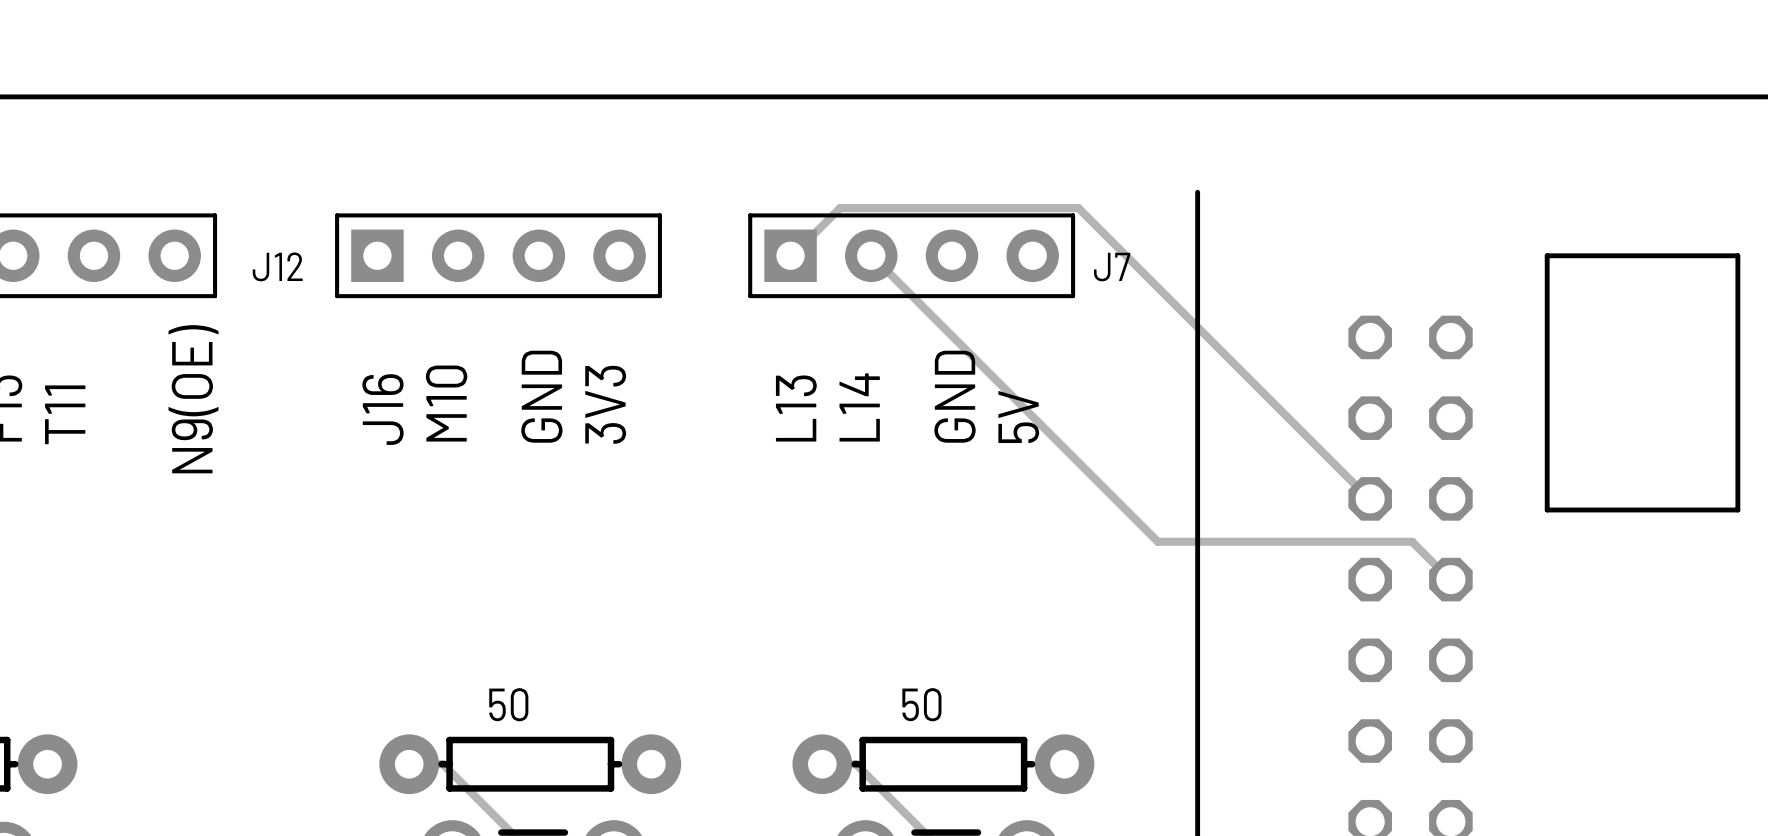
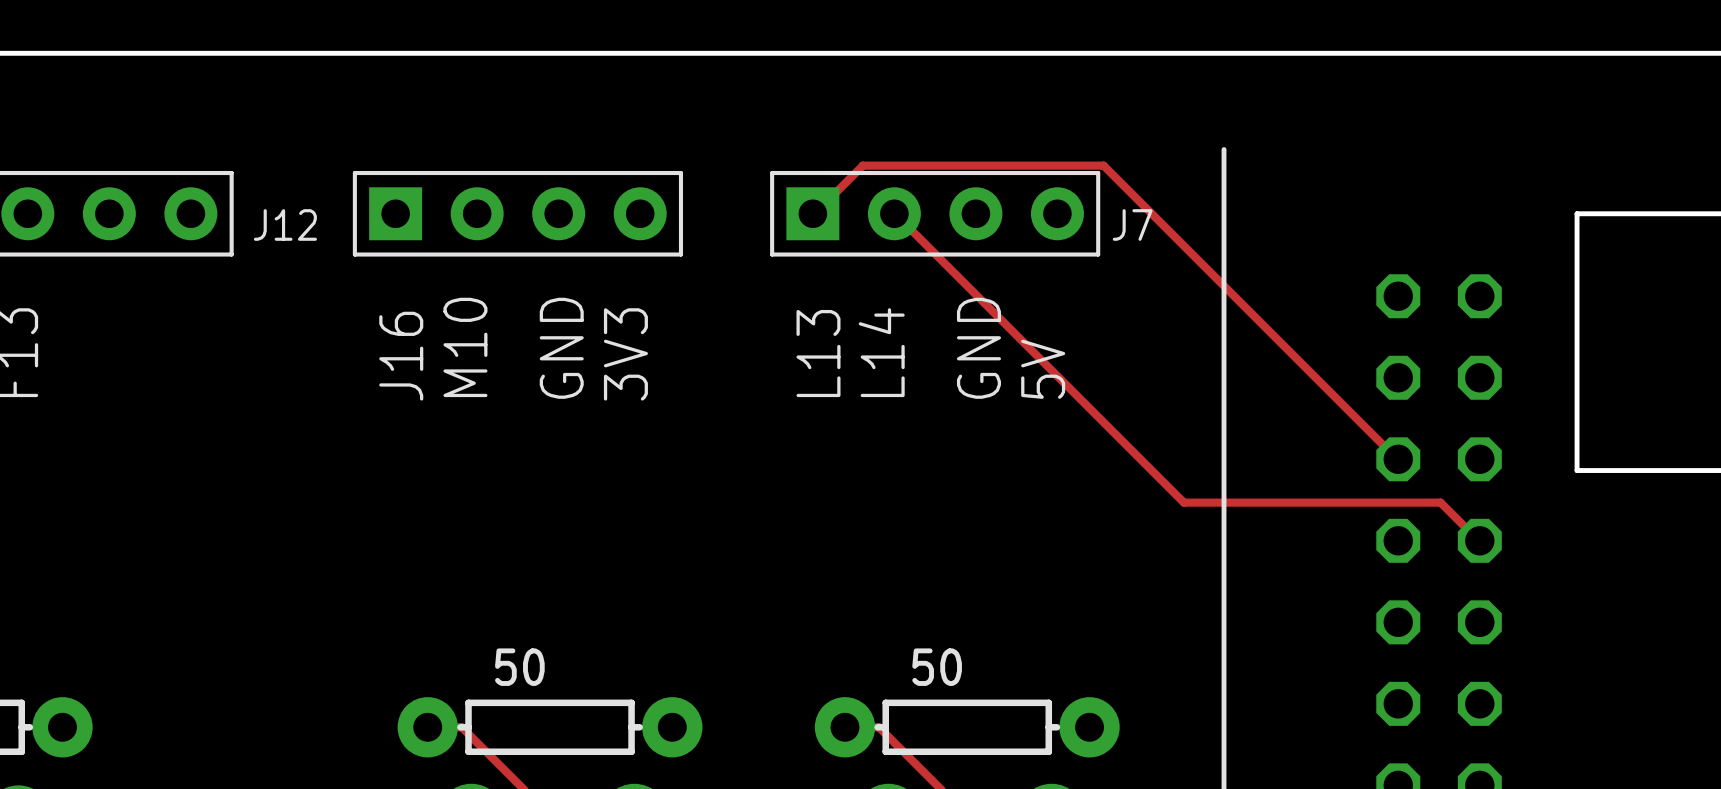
text: N9(OE) (193, 399) -> none
text: T11 (65, 414) -> none

